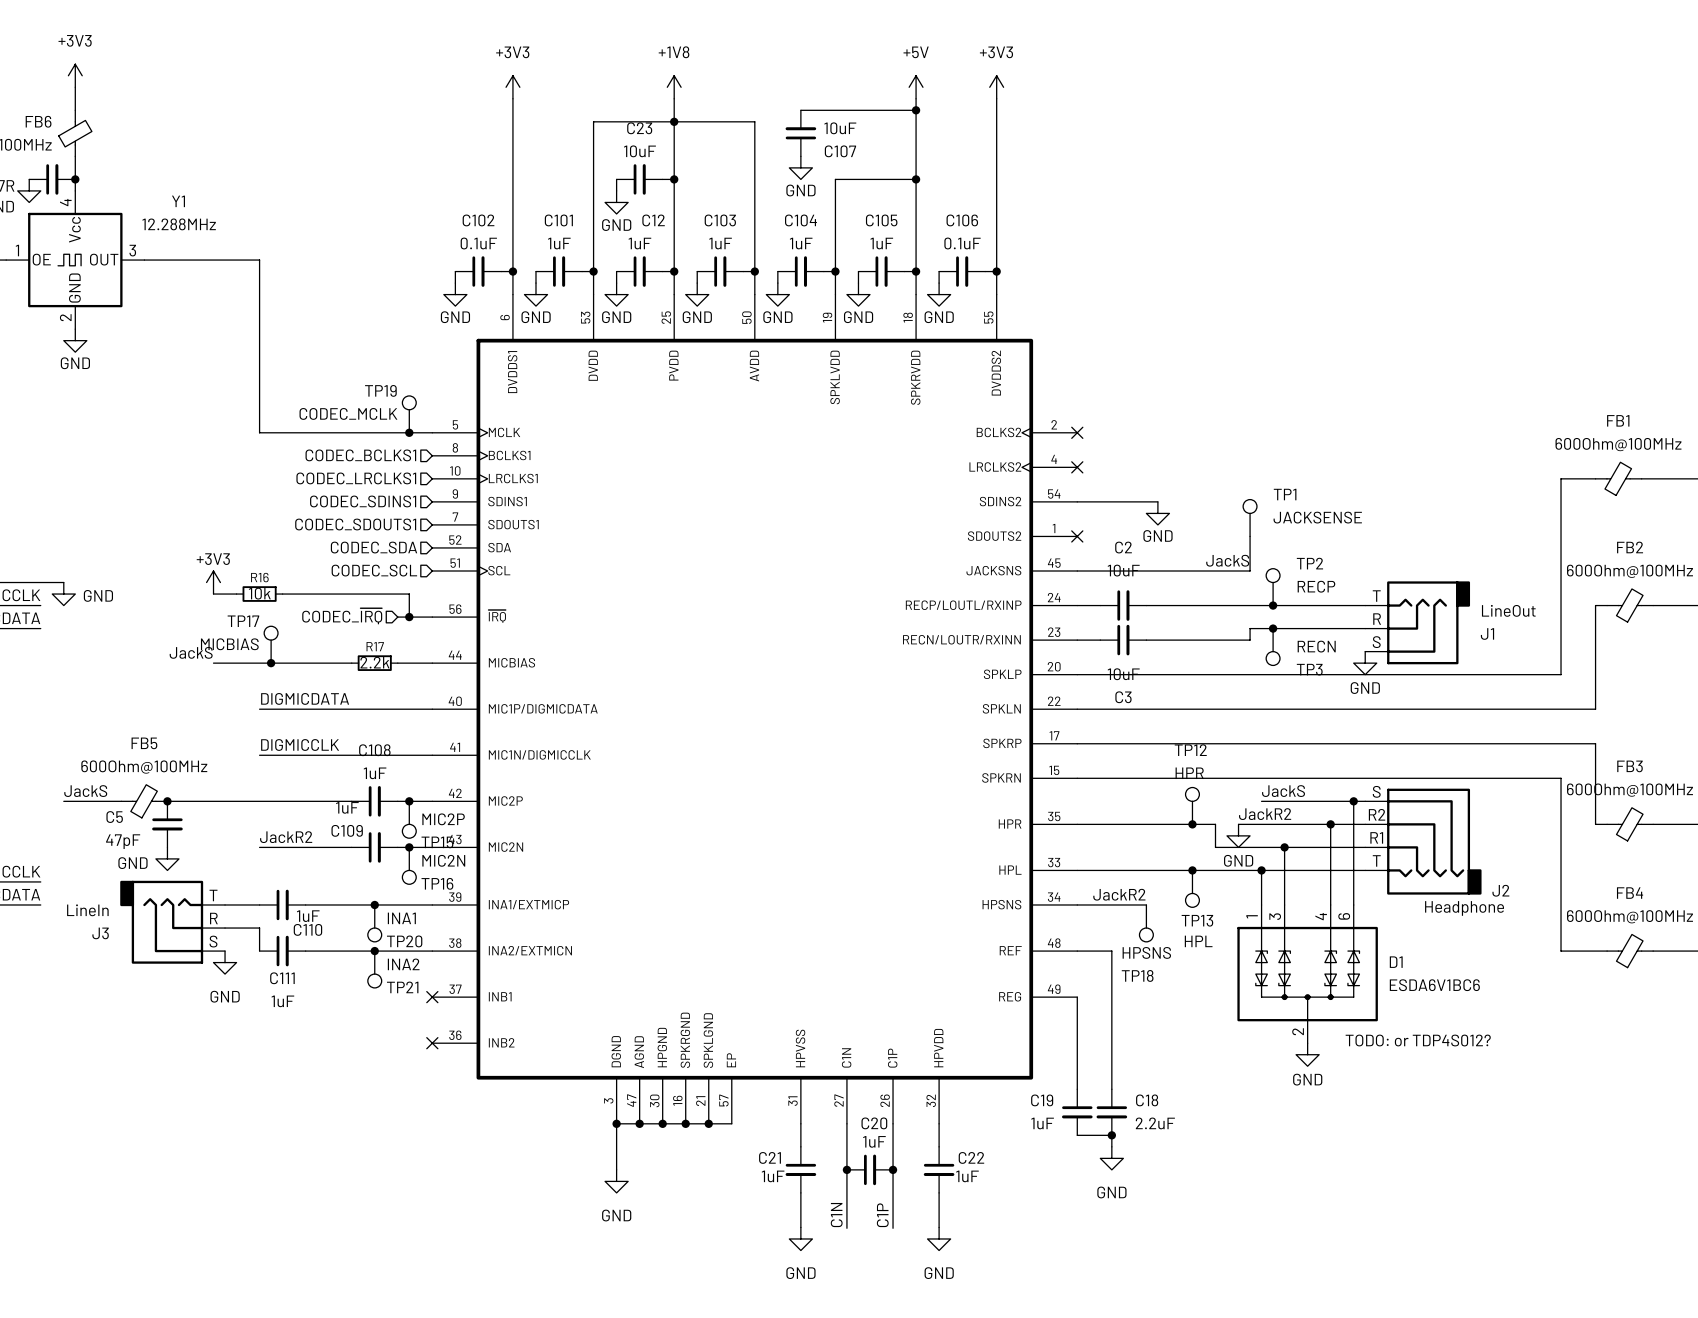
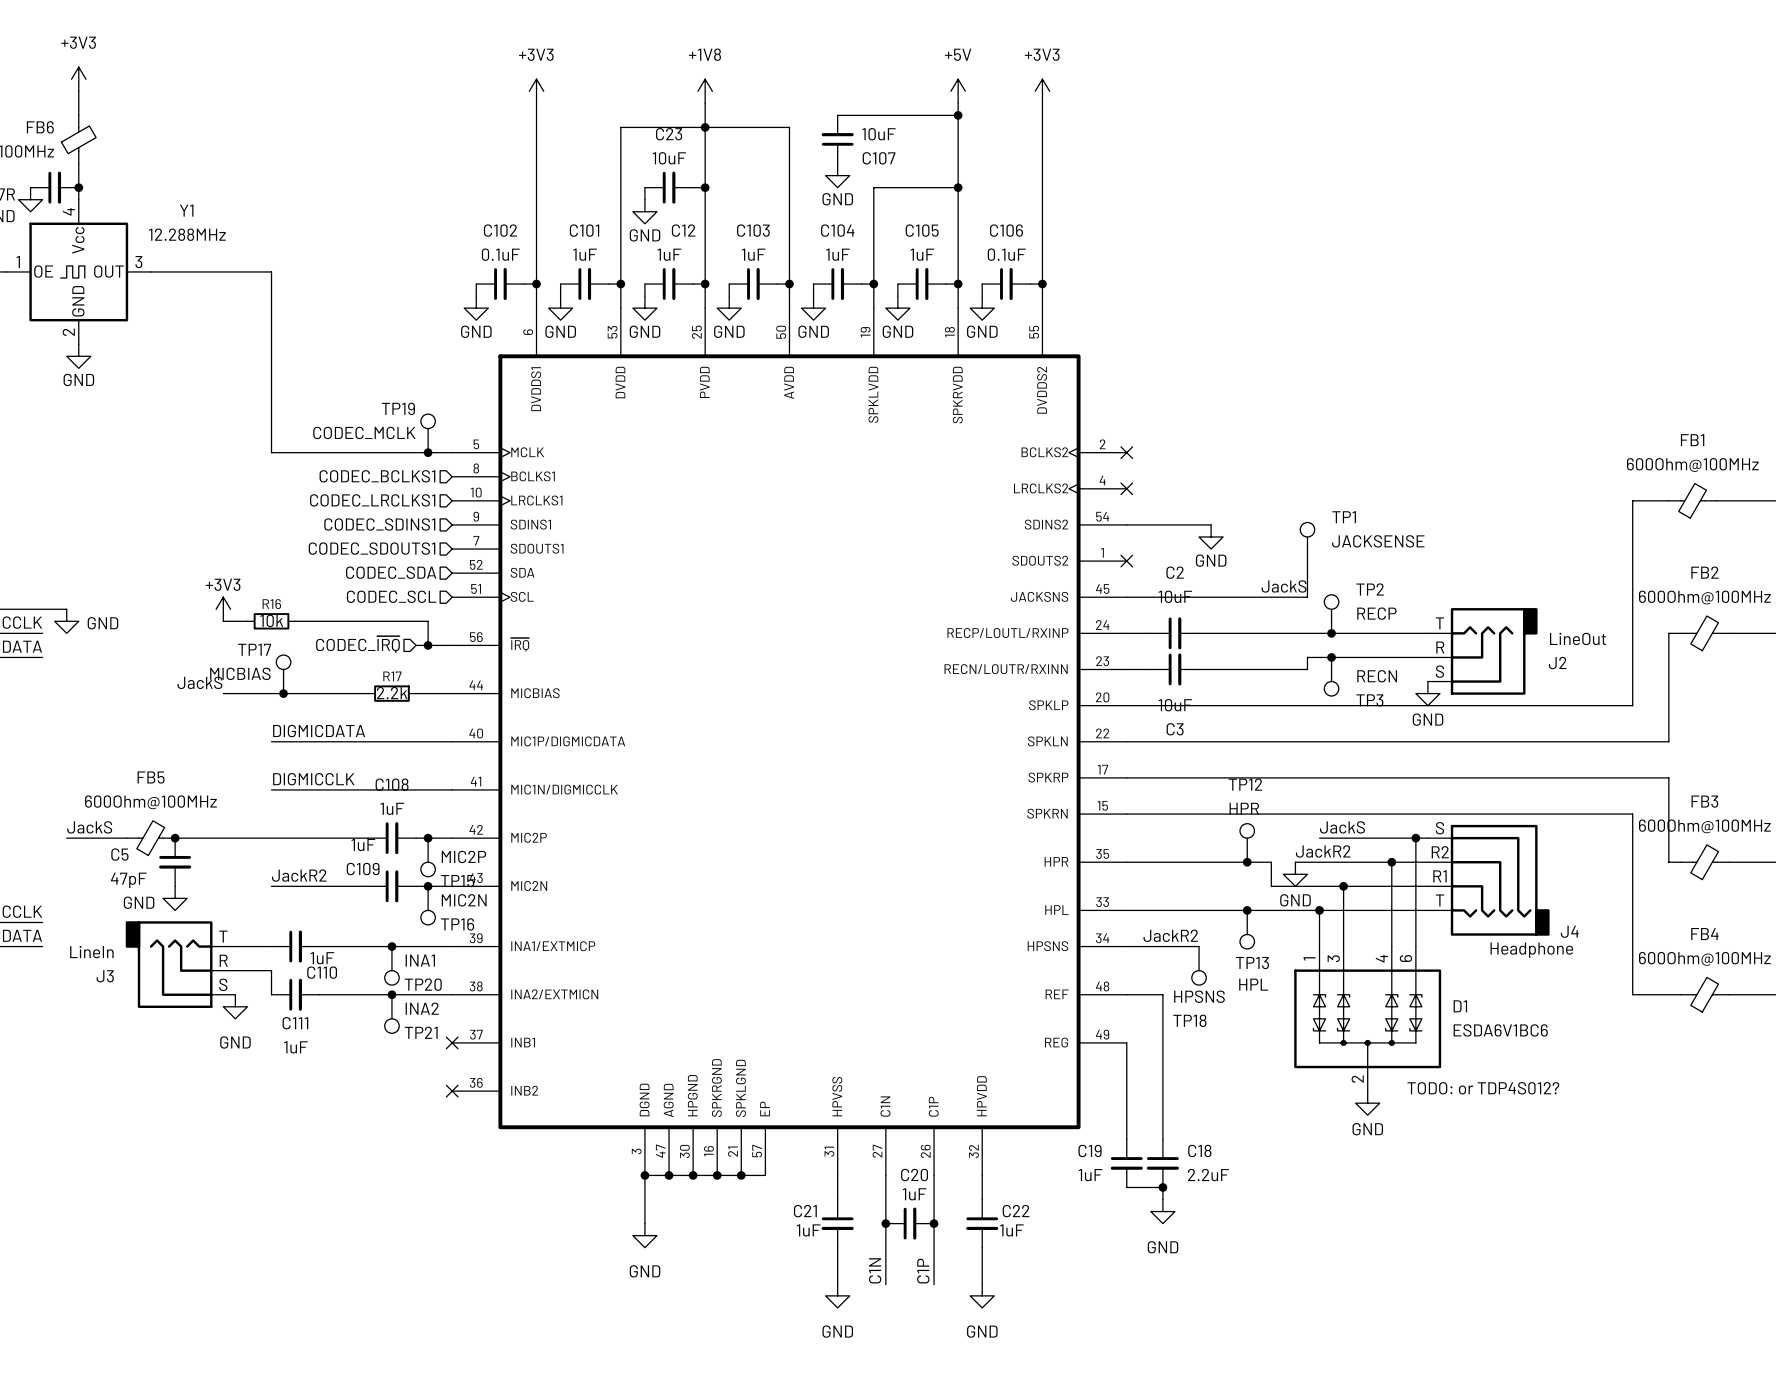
J1 name: J1 (1487, 633) -> J2 (1557, 663)
J2 name: J2 (1500, 890) -> J4 (1569, 931)

